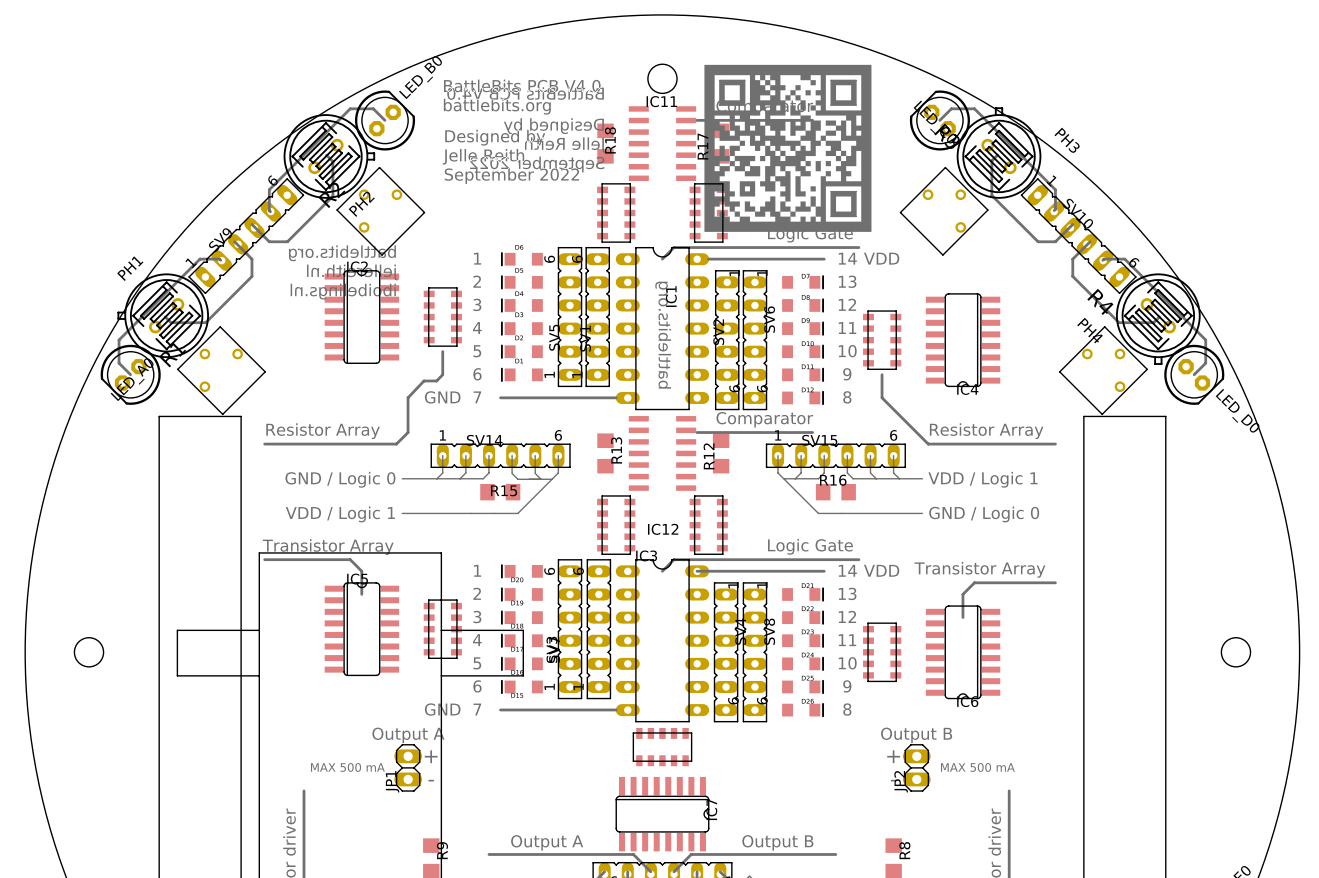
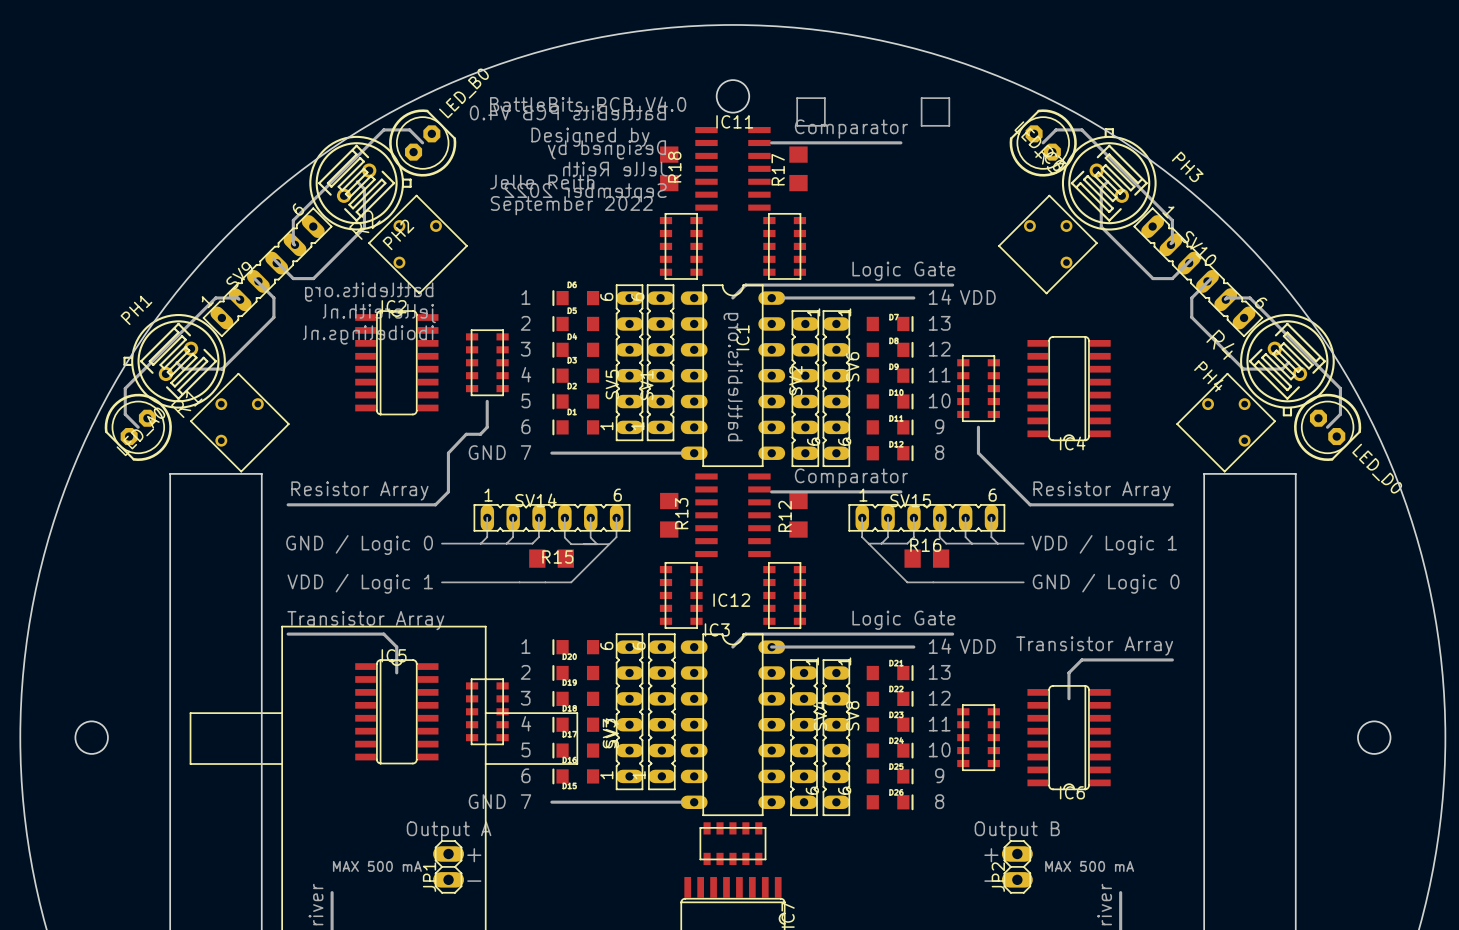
drawing: [704, 64, 872, 232] -> none
text: battlebits.org (497, 106) -> none
text position: Designed by (495, 137) -> Designed by (590, 137)
line: (831, 191) (855, 191) (855, 216) (831, 216) (831, 191) -> none

